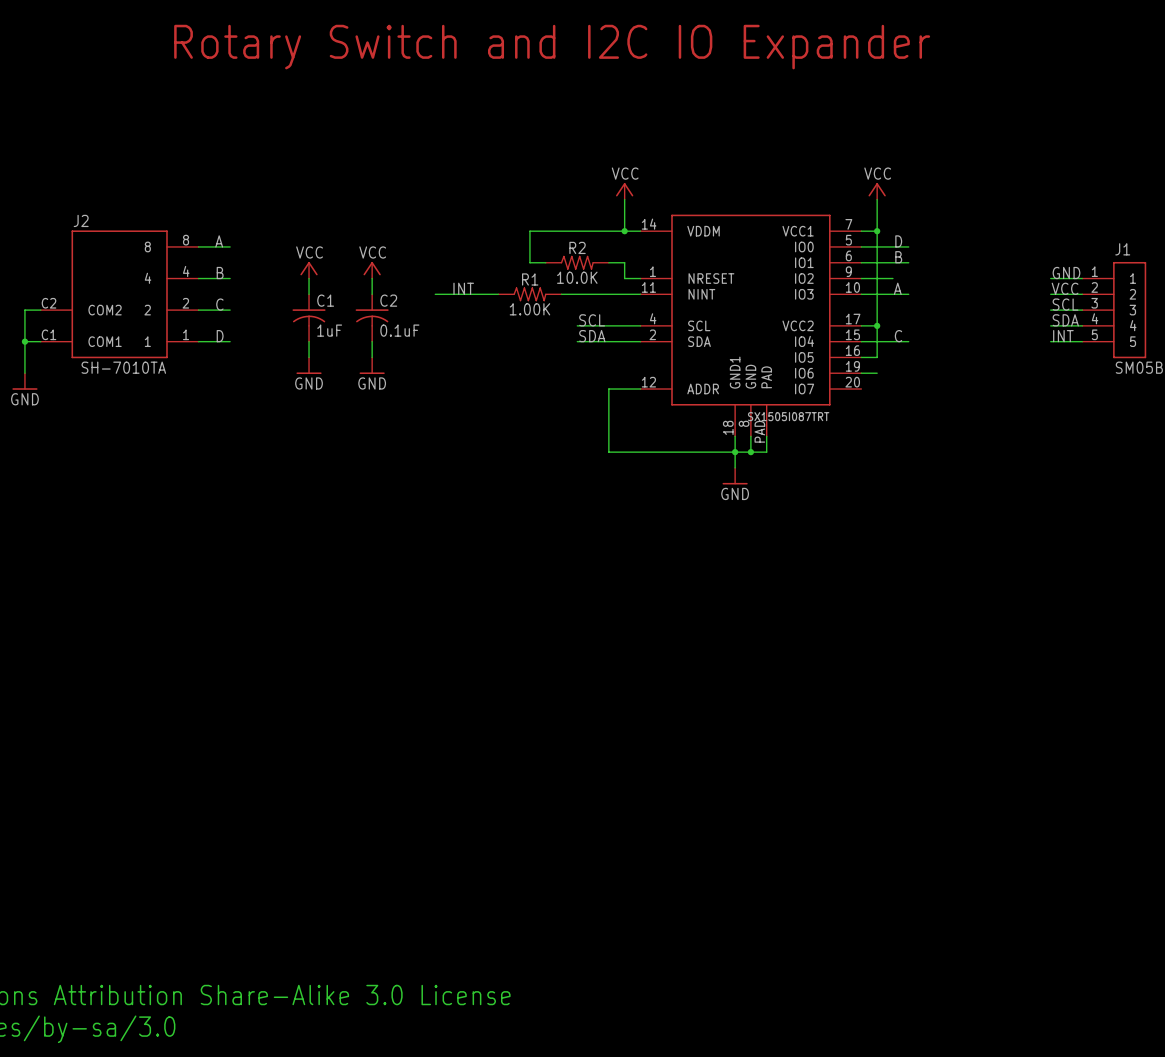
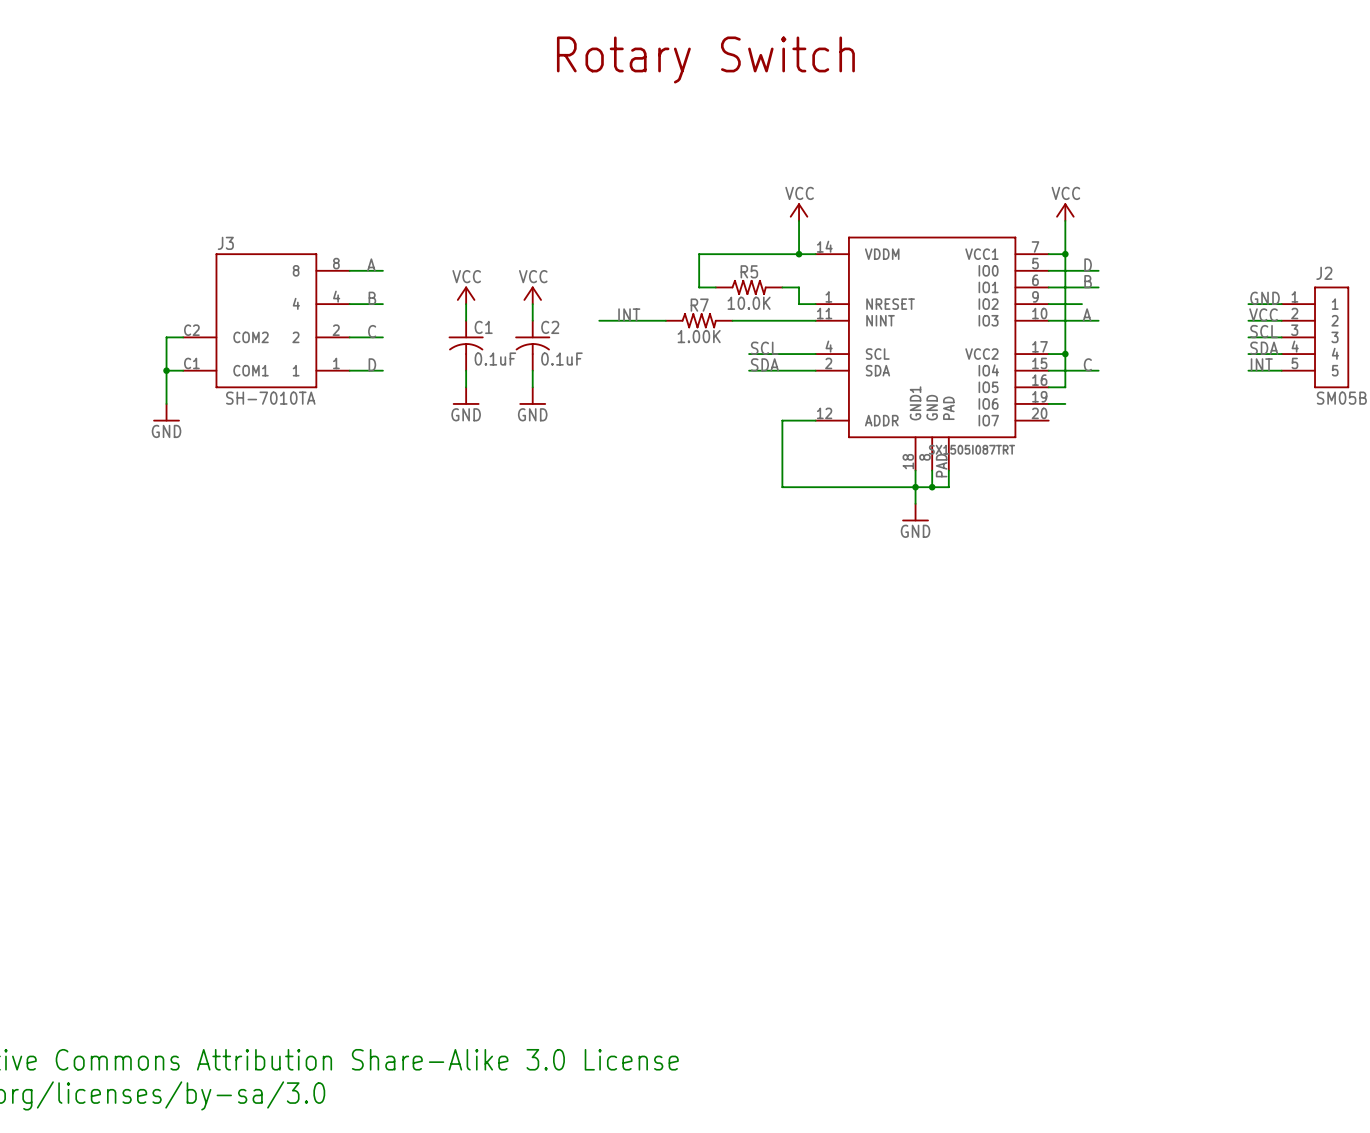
text: none -> Rotary Switch (705, 59)
text: Rotary Switch and I2C IO Expander (552, 47) -> none
J2 name: J2 (81, 220) -> J3 (225, 243)
R2 name: R2 (577, 247) -> R5 (749, 271)
J1 name: J1 (1122, 249) -> J2 (1324, 273)
R1 name: R1 (530, 279) -> R7 (699, 305)
C1 value: 1uF (329, 330) -> 0.1uF (495, 359)

